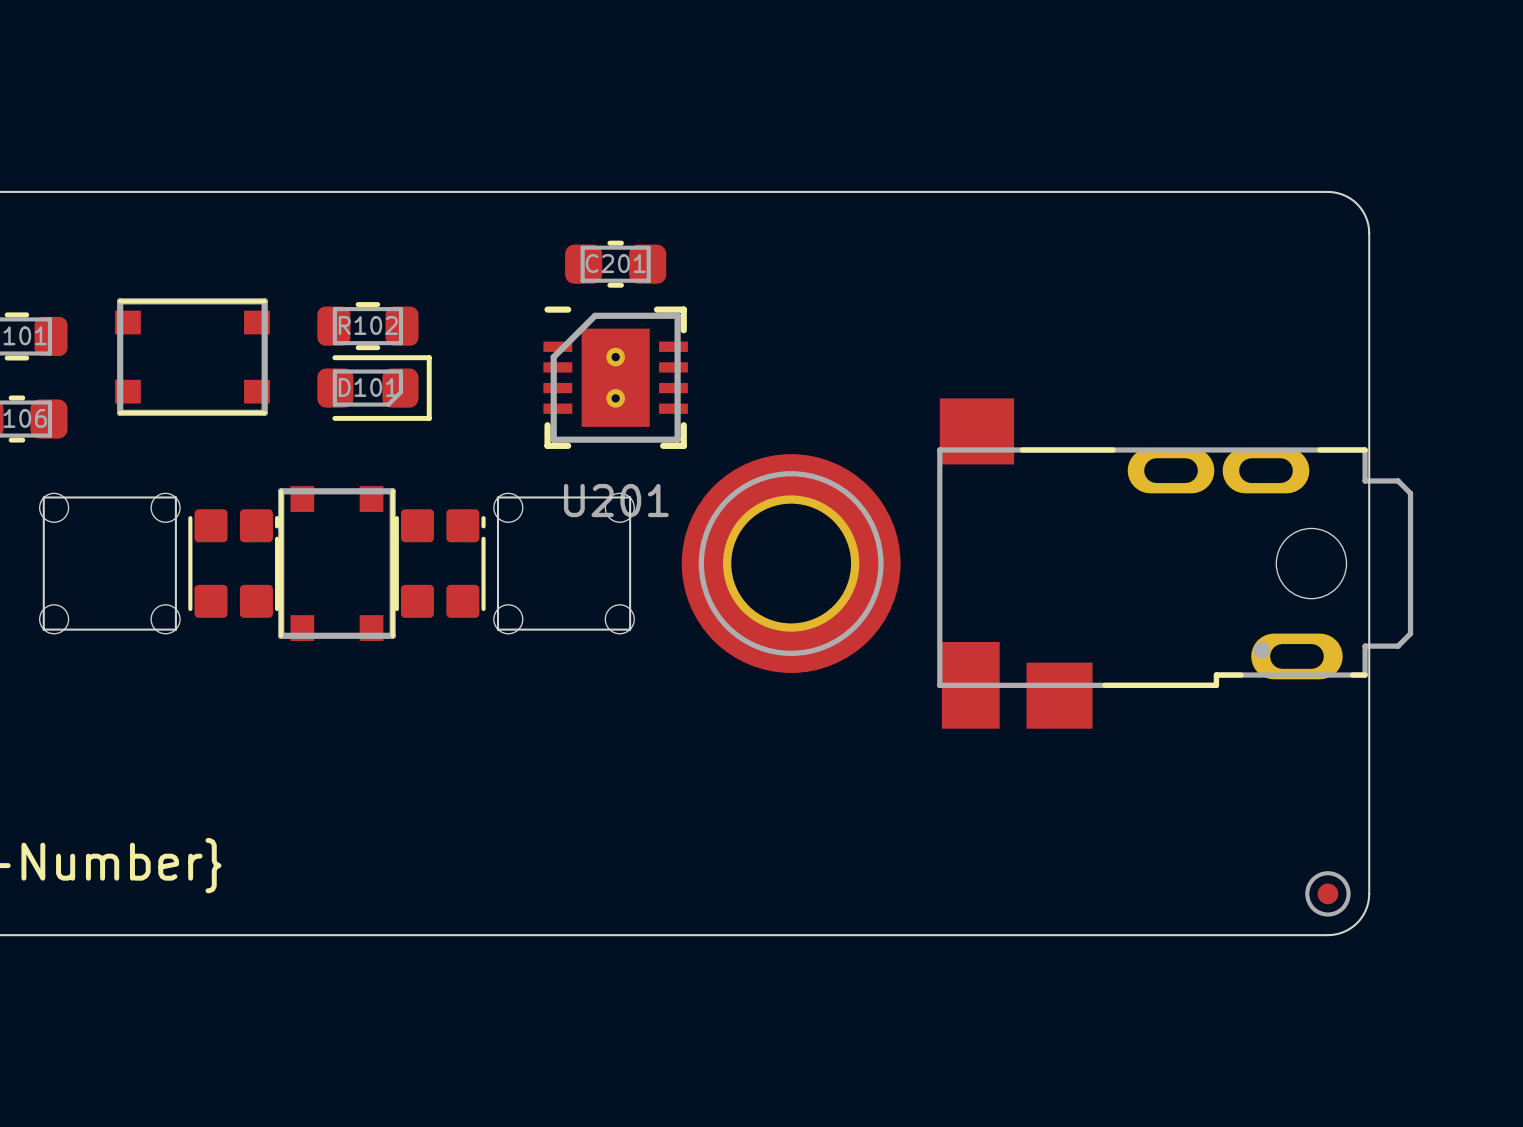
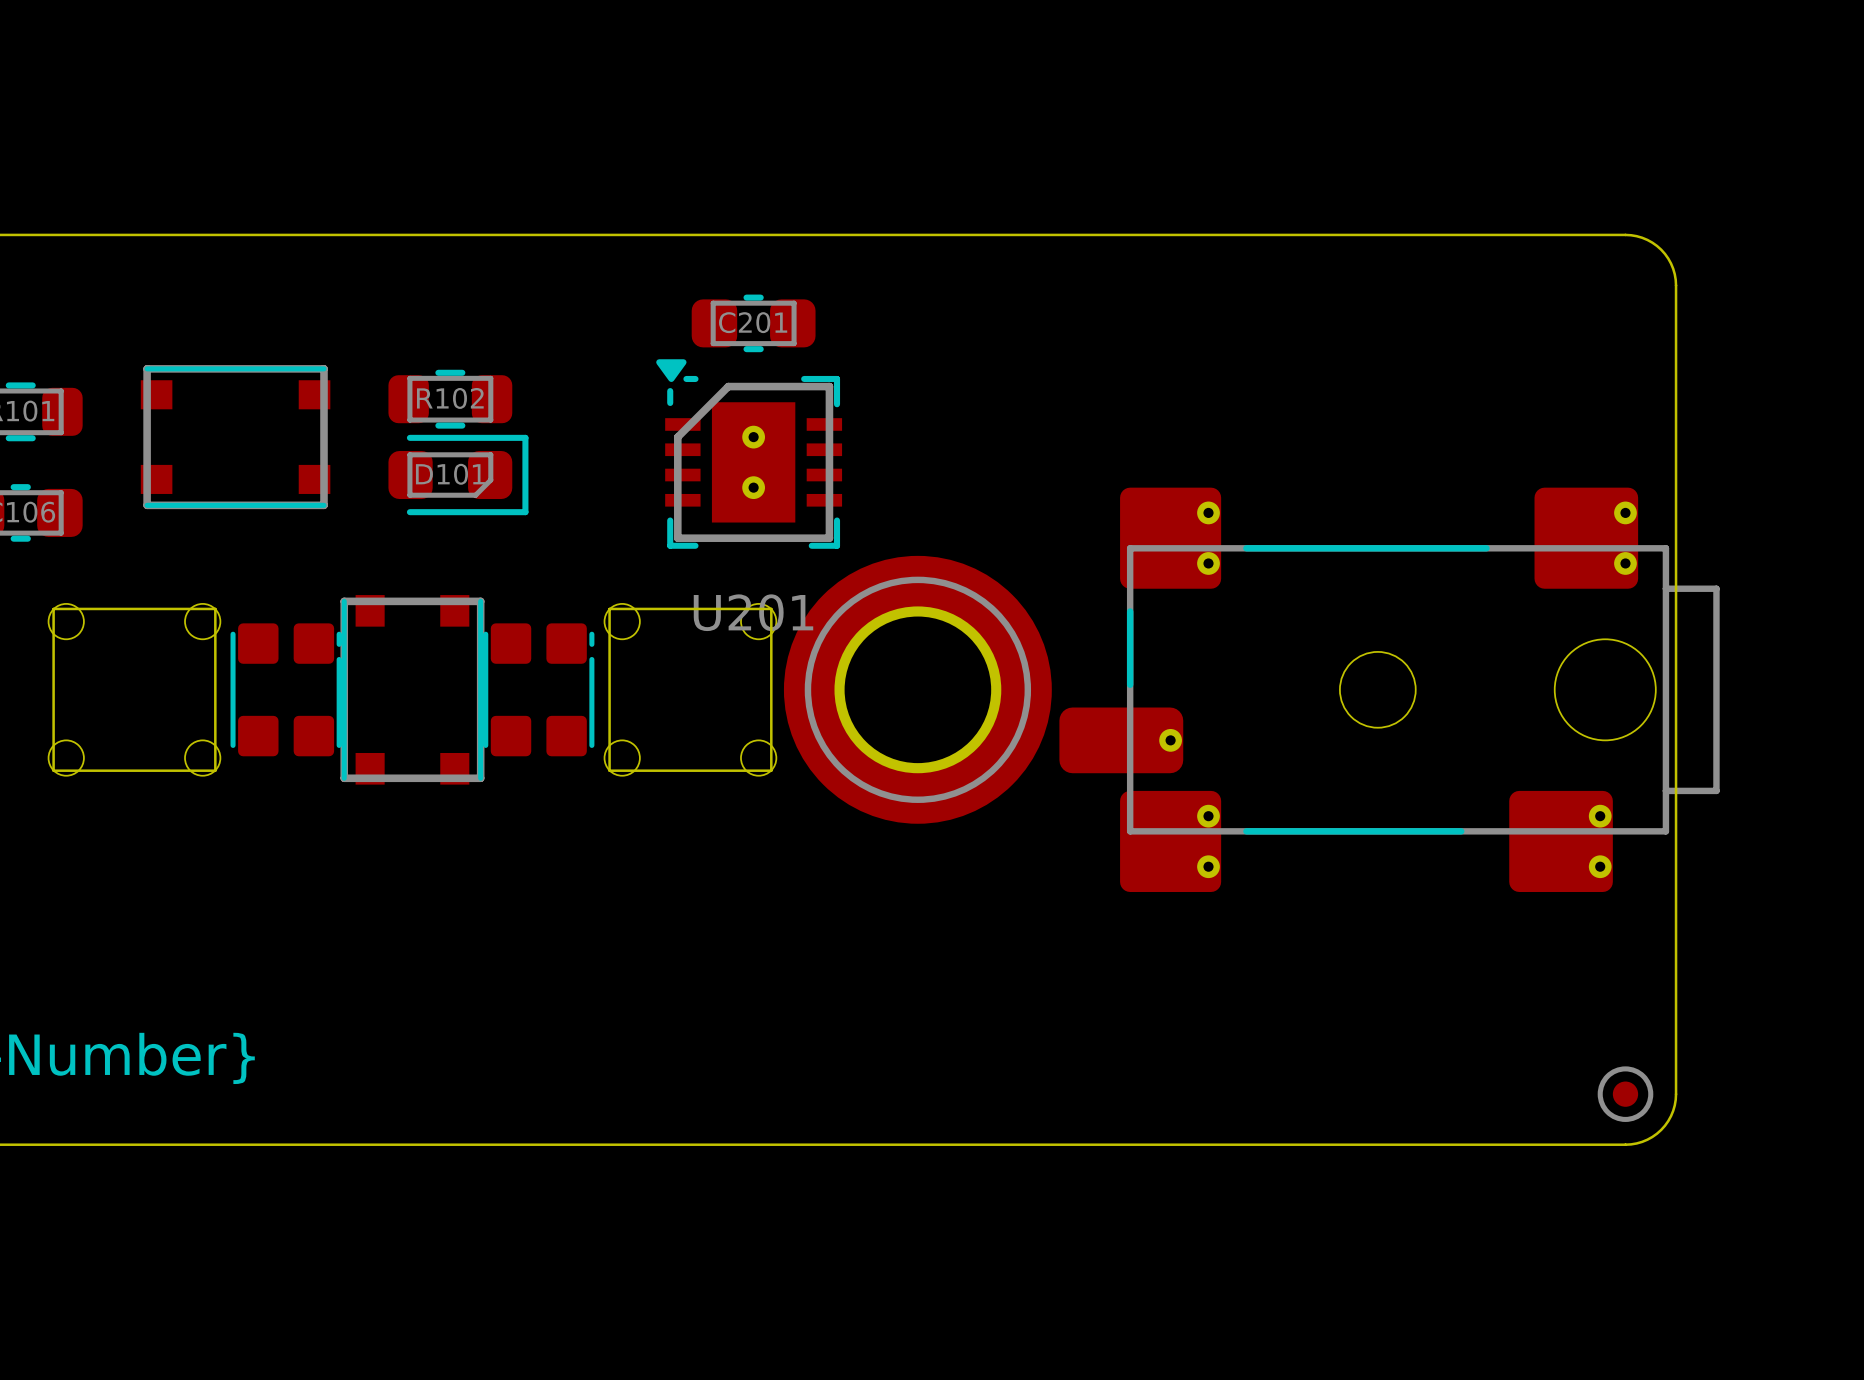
U201 footprint: [543, 306, 688, 449] -> [656, 359, 843, 549]
part footprint: [937, 398, 1414, 729] -> [1059, 487, 1720, 892]
part position: (791, 563) -> (917, 689)

